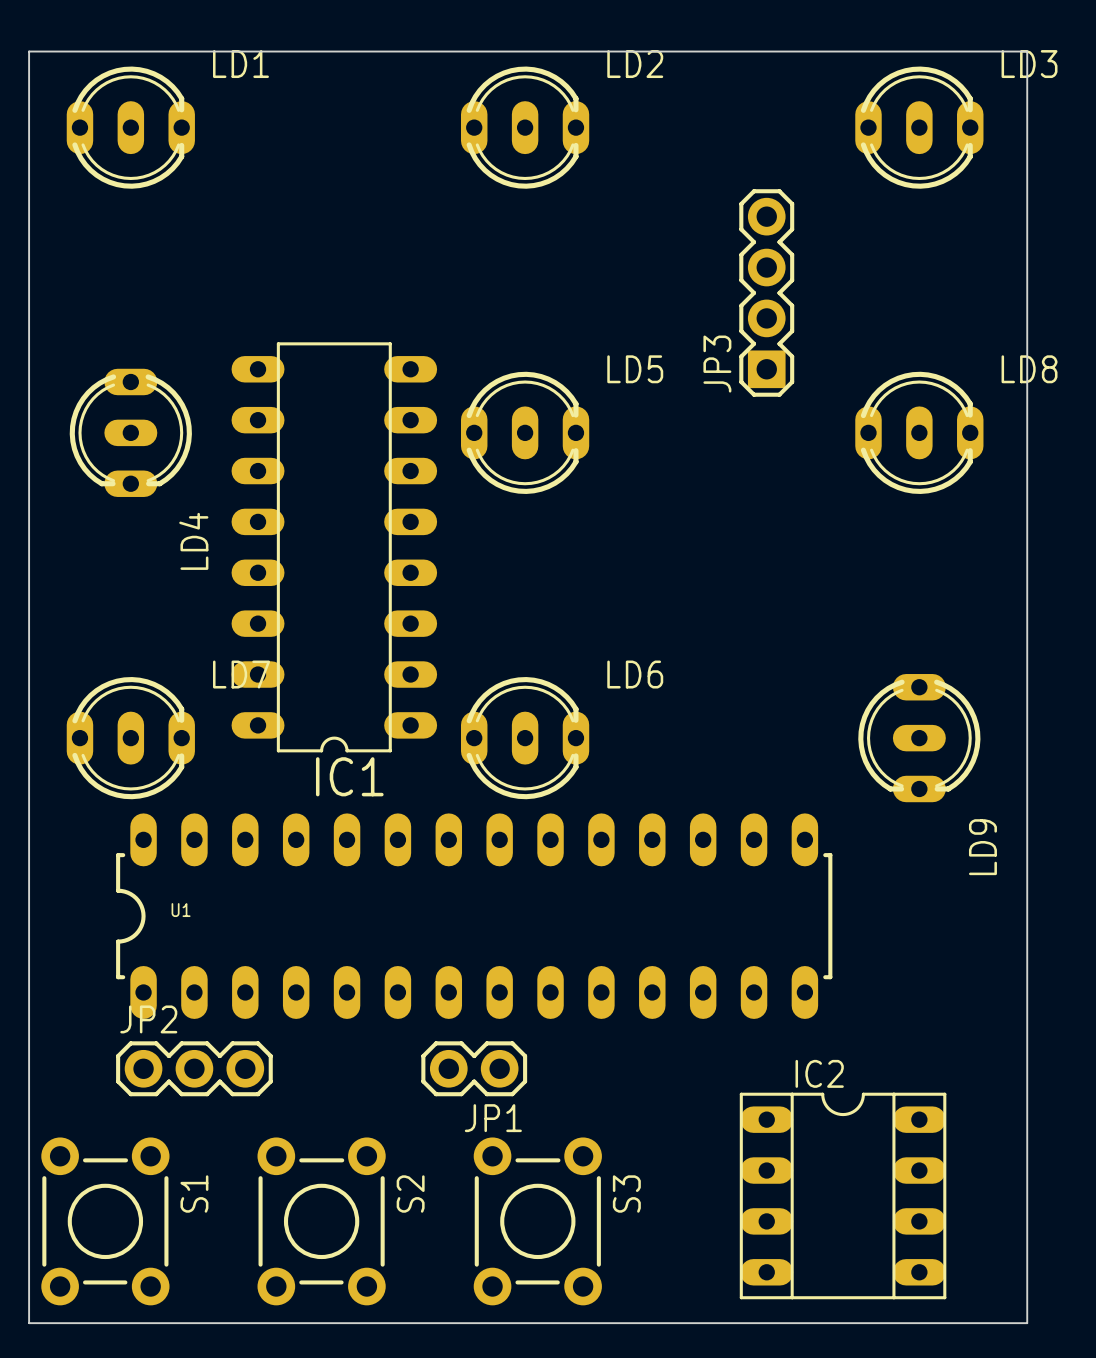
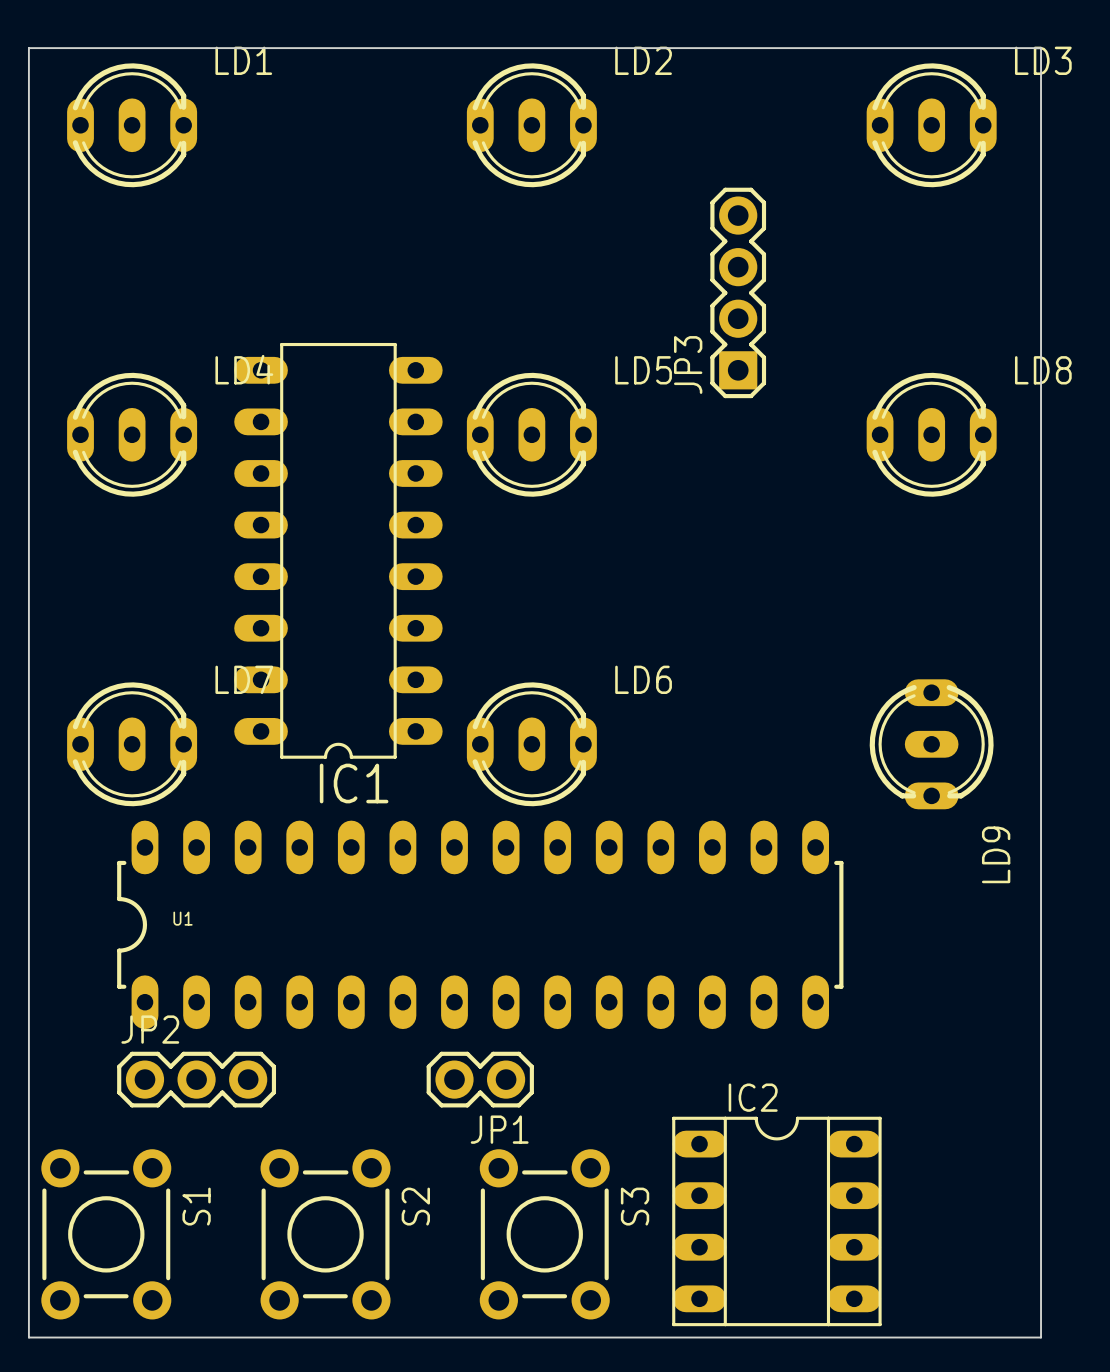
JP3 position: (766, 292) -> (738, 292)
LD4 rotation: 0° (130, 432) -> 90° counterclockwise (132, 434)
IC2 position: (843, 1195) -> (776, 1221)

